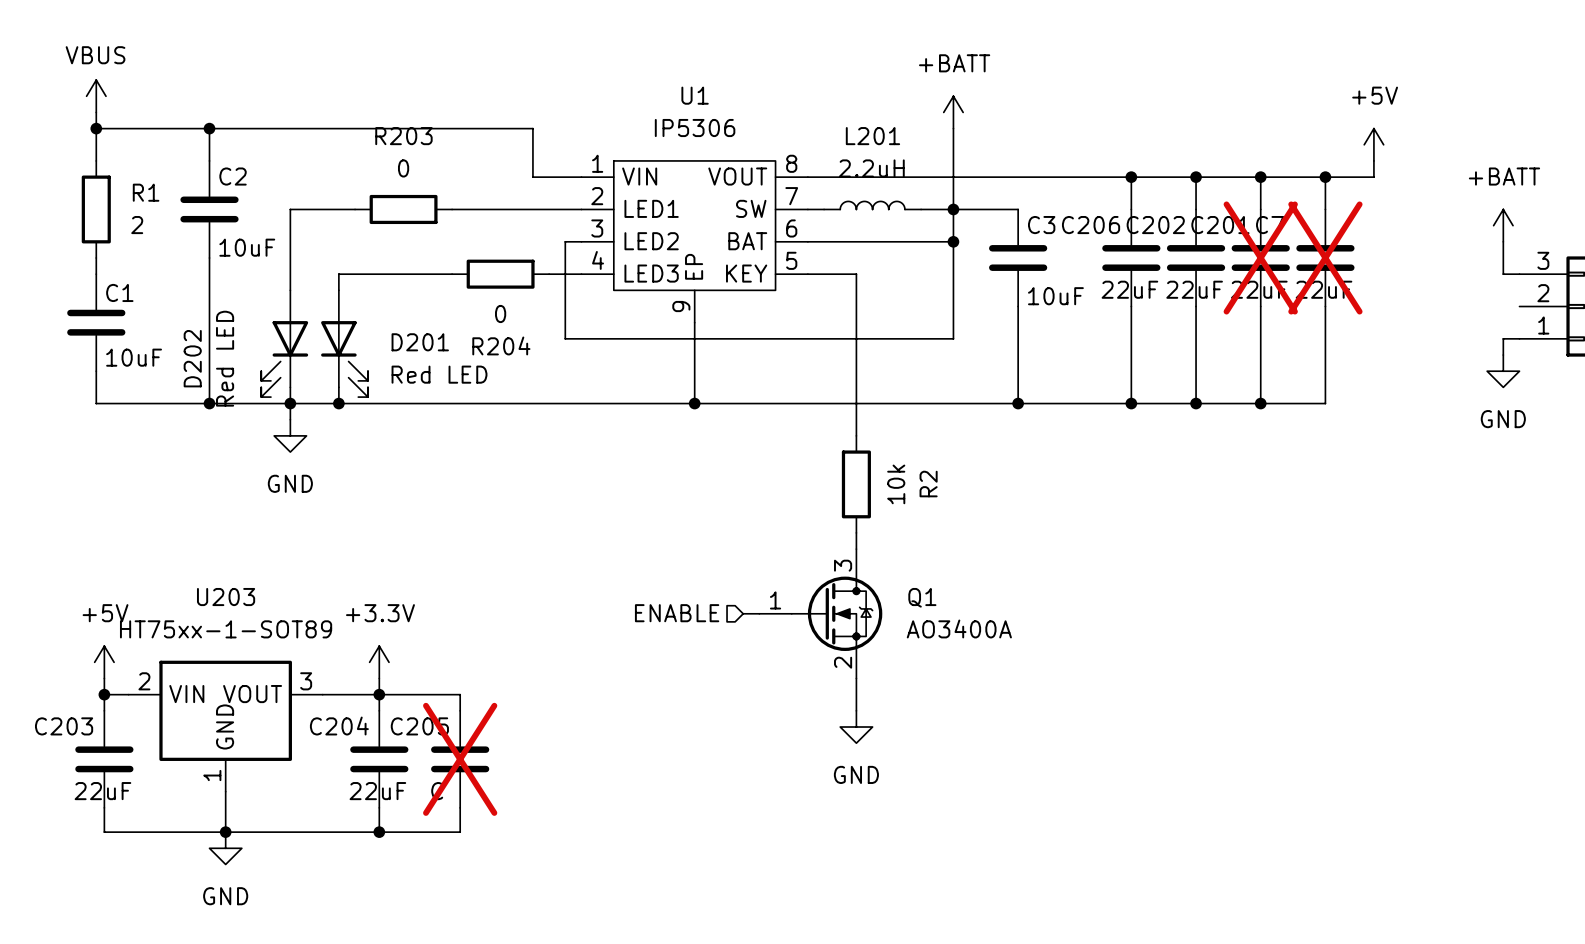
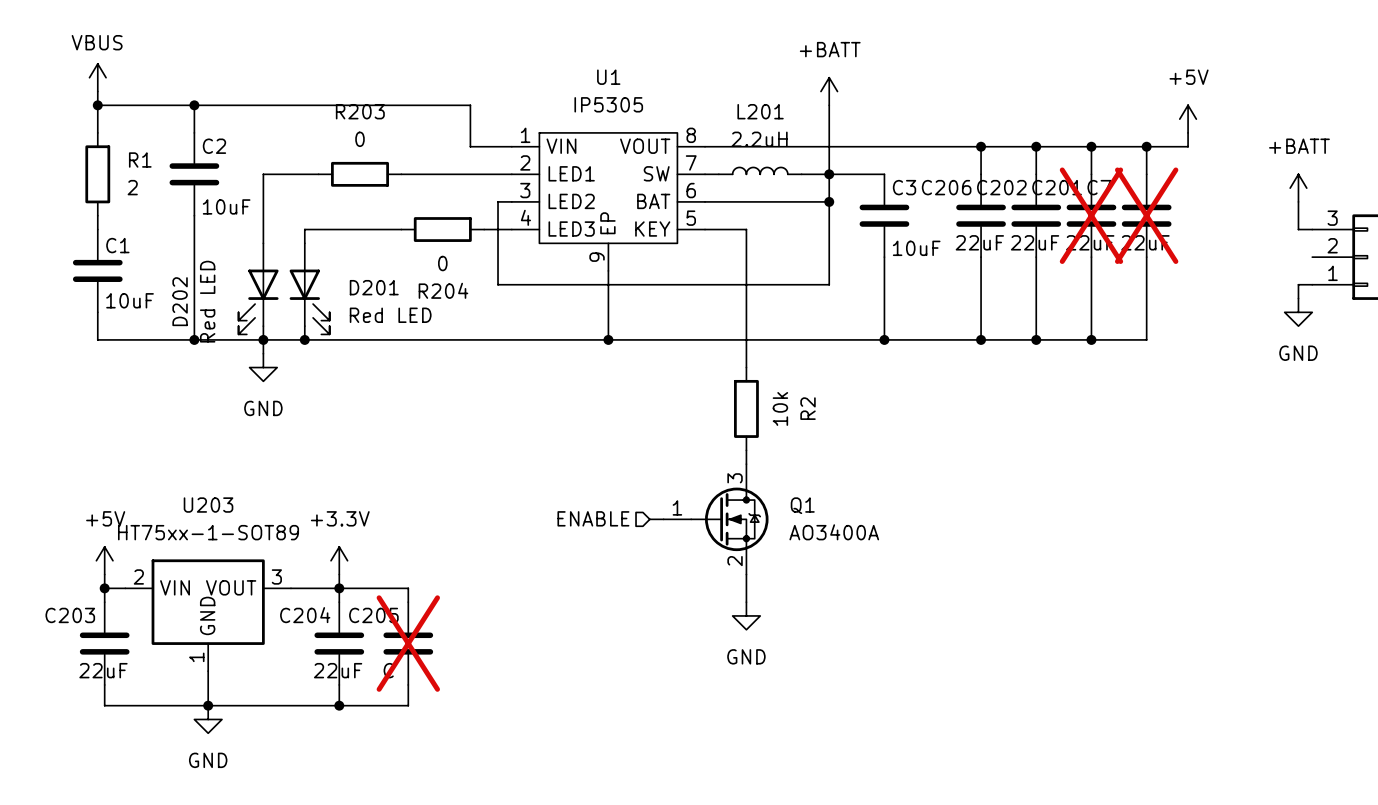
U1 value: IP5306 (695, 128) -> IP5305 (608, 104)

